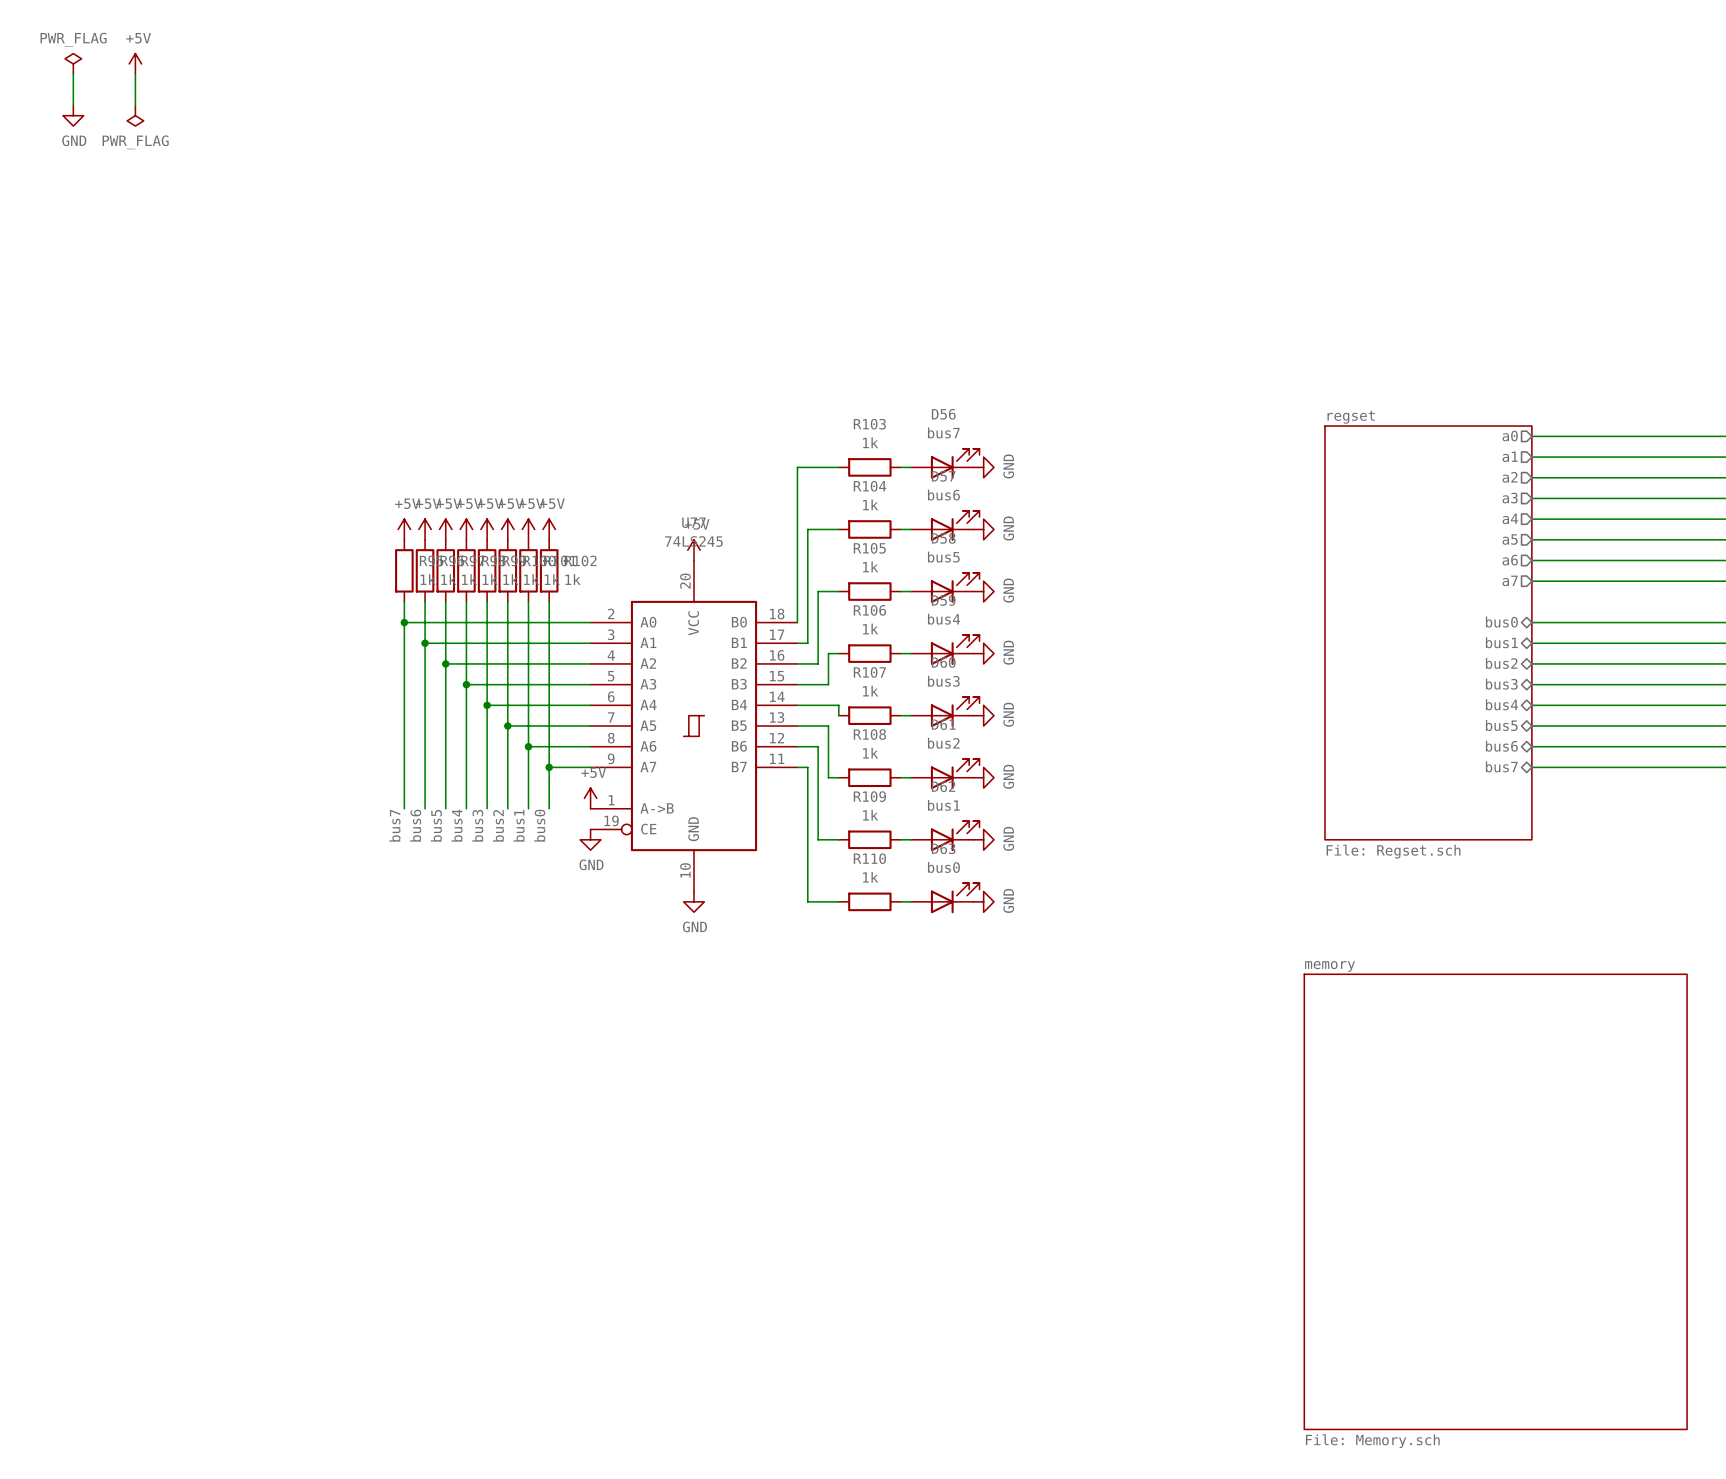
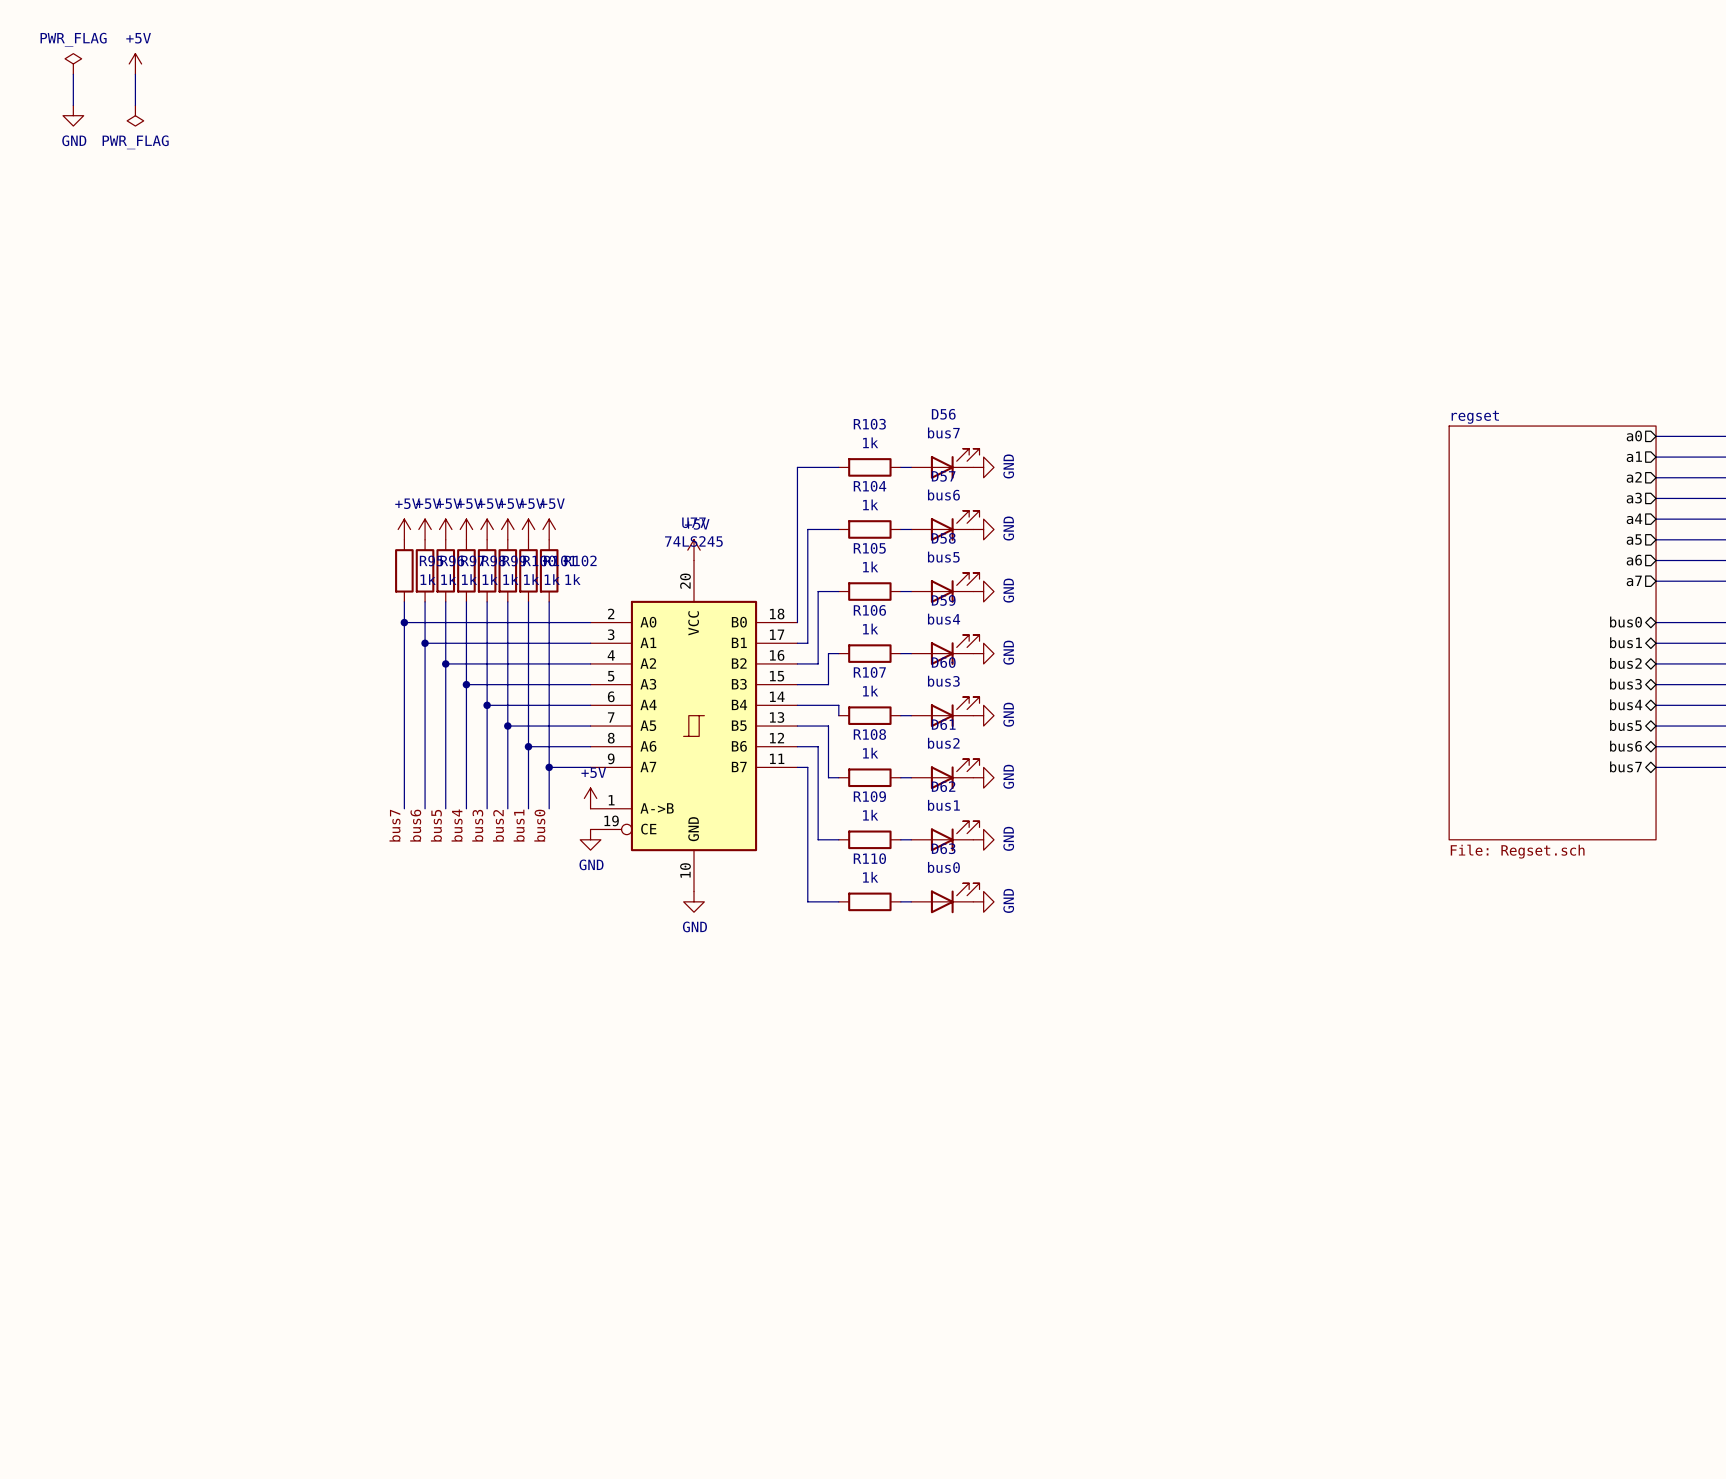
sheet pin position: a0 (1510, 436) -> a0 (1634, 436)
wire: (1531, 436) (1656, 436) -> none
sheet pin position: a1 (1510, 456) -> a1 (1634, 456)
wire: (1531, 457) (1656, 457) -> none
sheet pin position: a2 (1510, 477) -> a2 (1634, 477)
wire: (1531, 477) (1656, 477) -> none
sheet pin position: a3 (1510, 498) -> a3 (1634, 498)
wire: (1531, 498) (1656, 498) -> none
sheet pin position: a4 (1510, 518) -> a4 (1634, 518)
wire: (1531, 519) (1656, 519) -> none
sheet pin position: a5 (1510, 539) -> a5 (1634, 539)
wire: (1531, 539) (1656, 539) -> none
sheet pin position: a6 (1510, 560) -> a6 (1634, 560)
wire: (1531, 560) (1656, 560) -> none
sheet pin position: a7 (1510, 580) -> a7 (1634, 580)
wire: (1531, 581) (1656, 581) -> none
sheet pin position: bus0 (1501, 622) -> bus0 (1626, 622)
wire: (1531, 622) (1656, 622) -> none
sheet regset position: (1428, 632) -> (1552, 632)
sheet pin position: bus1 (1501, 642) -> bus1 (1625, 642)
wire: (1531, 643) (1656, 643) -> none
sheet pin position: bus2 (1501, 663) -> bus2 (1625, 663)
wire: (1531, 663) (1656, 663) -> none
sheet pin position: bus3 (1501, 684) -> bus3 (1625, 684)
wire: (1531, 684) (1656, 684) -> none
sheet pin position: bus4 (1502, 704) -> bus4 (1626, 704)
wire: (1531, 705) (1656, 705) -> none
sheet pin position: bus5 (1501, 725) -> bus5 (1625, 725)
wire: (1531, 726) (1656, 726) -> none
sheet pin position: bus6 (1501, 746) -> bus6 (1626, 746)
wire: (1531, 746) (1656, 746) -> none
sheet pin position: bus7 (1501, 766) -> bus7 (1625, 766)
wire: (1531, 767) (1656, 767) -> none
sheet memory: File: Memory.sch (1495, 1201) -> none

